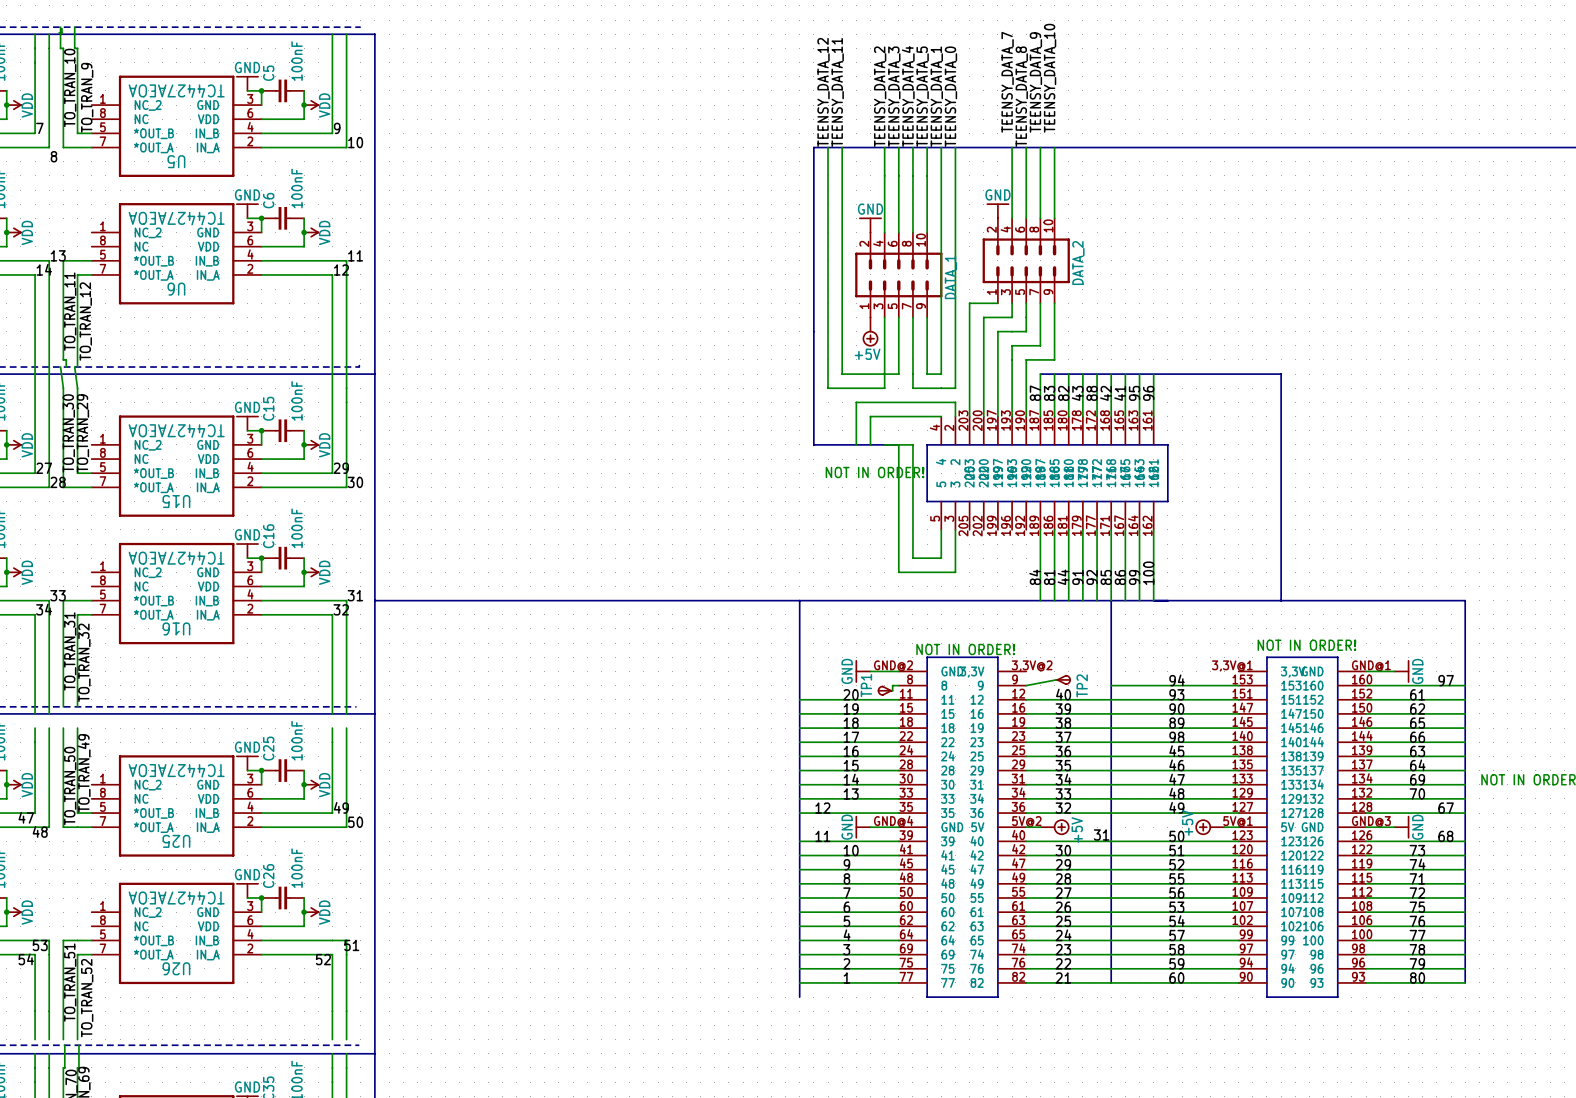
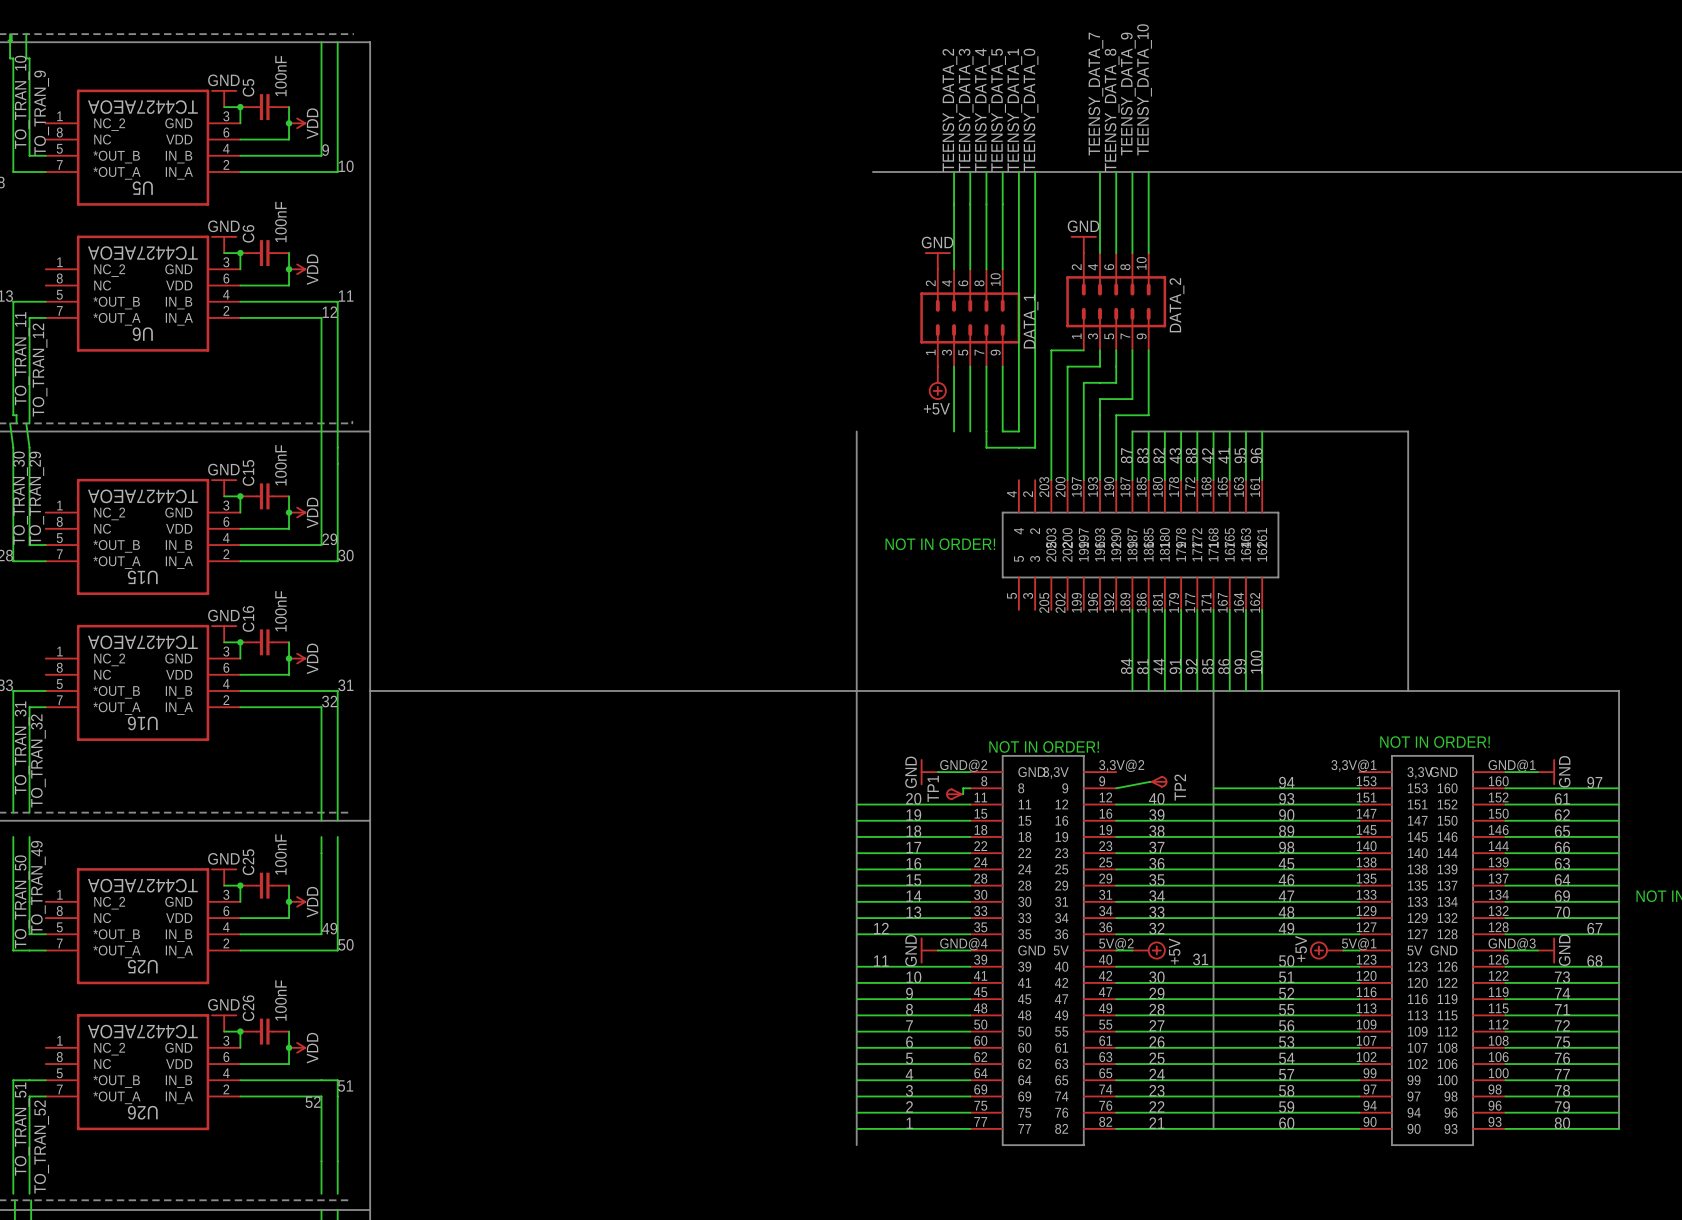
label: TEENSY_DATA_12 (823, 92) -> none
label: TEENSY_DATA_11 (837, 92) -> none
bus: (813, 147) (813, 444) (898, 444) -> none
wire: (828, 147) (828, 388) (884, 388) (884, 374) -> none
wire: (842, 147) (842, 374) (898, 374) -> none
bus: none -> (856, 431) (856, 691)
wire: (941, 416) (870, 416) (870, 444) -> none
wire: (955, 416) (955, 402) (856, 402) (856, 444) -> none
wire: (884, 444) (912, 444) (912, 558) (941, 558) (941, 529) -> none
wire: (898, 444) (898, 572) (955, 572) (955, 529) -> none

